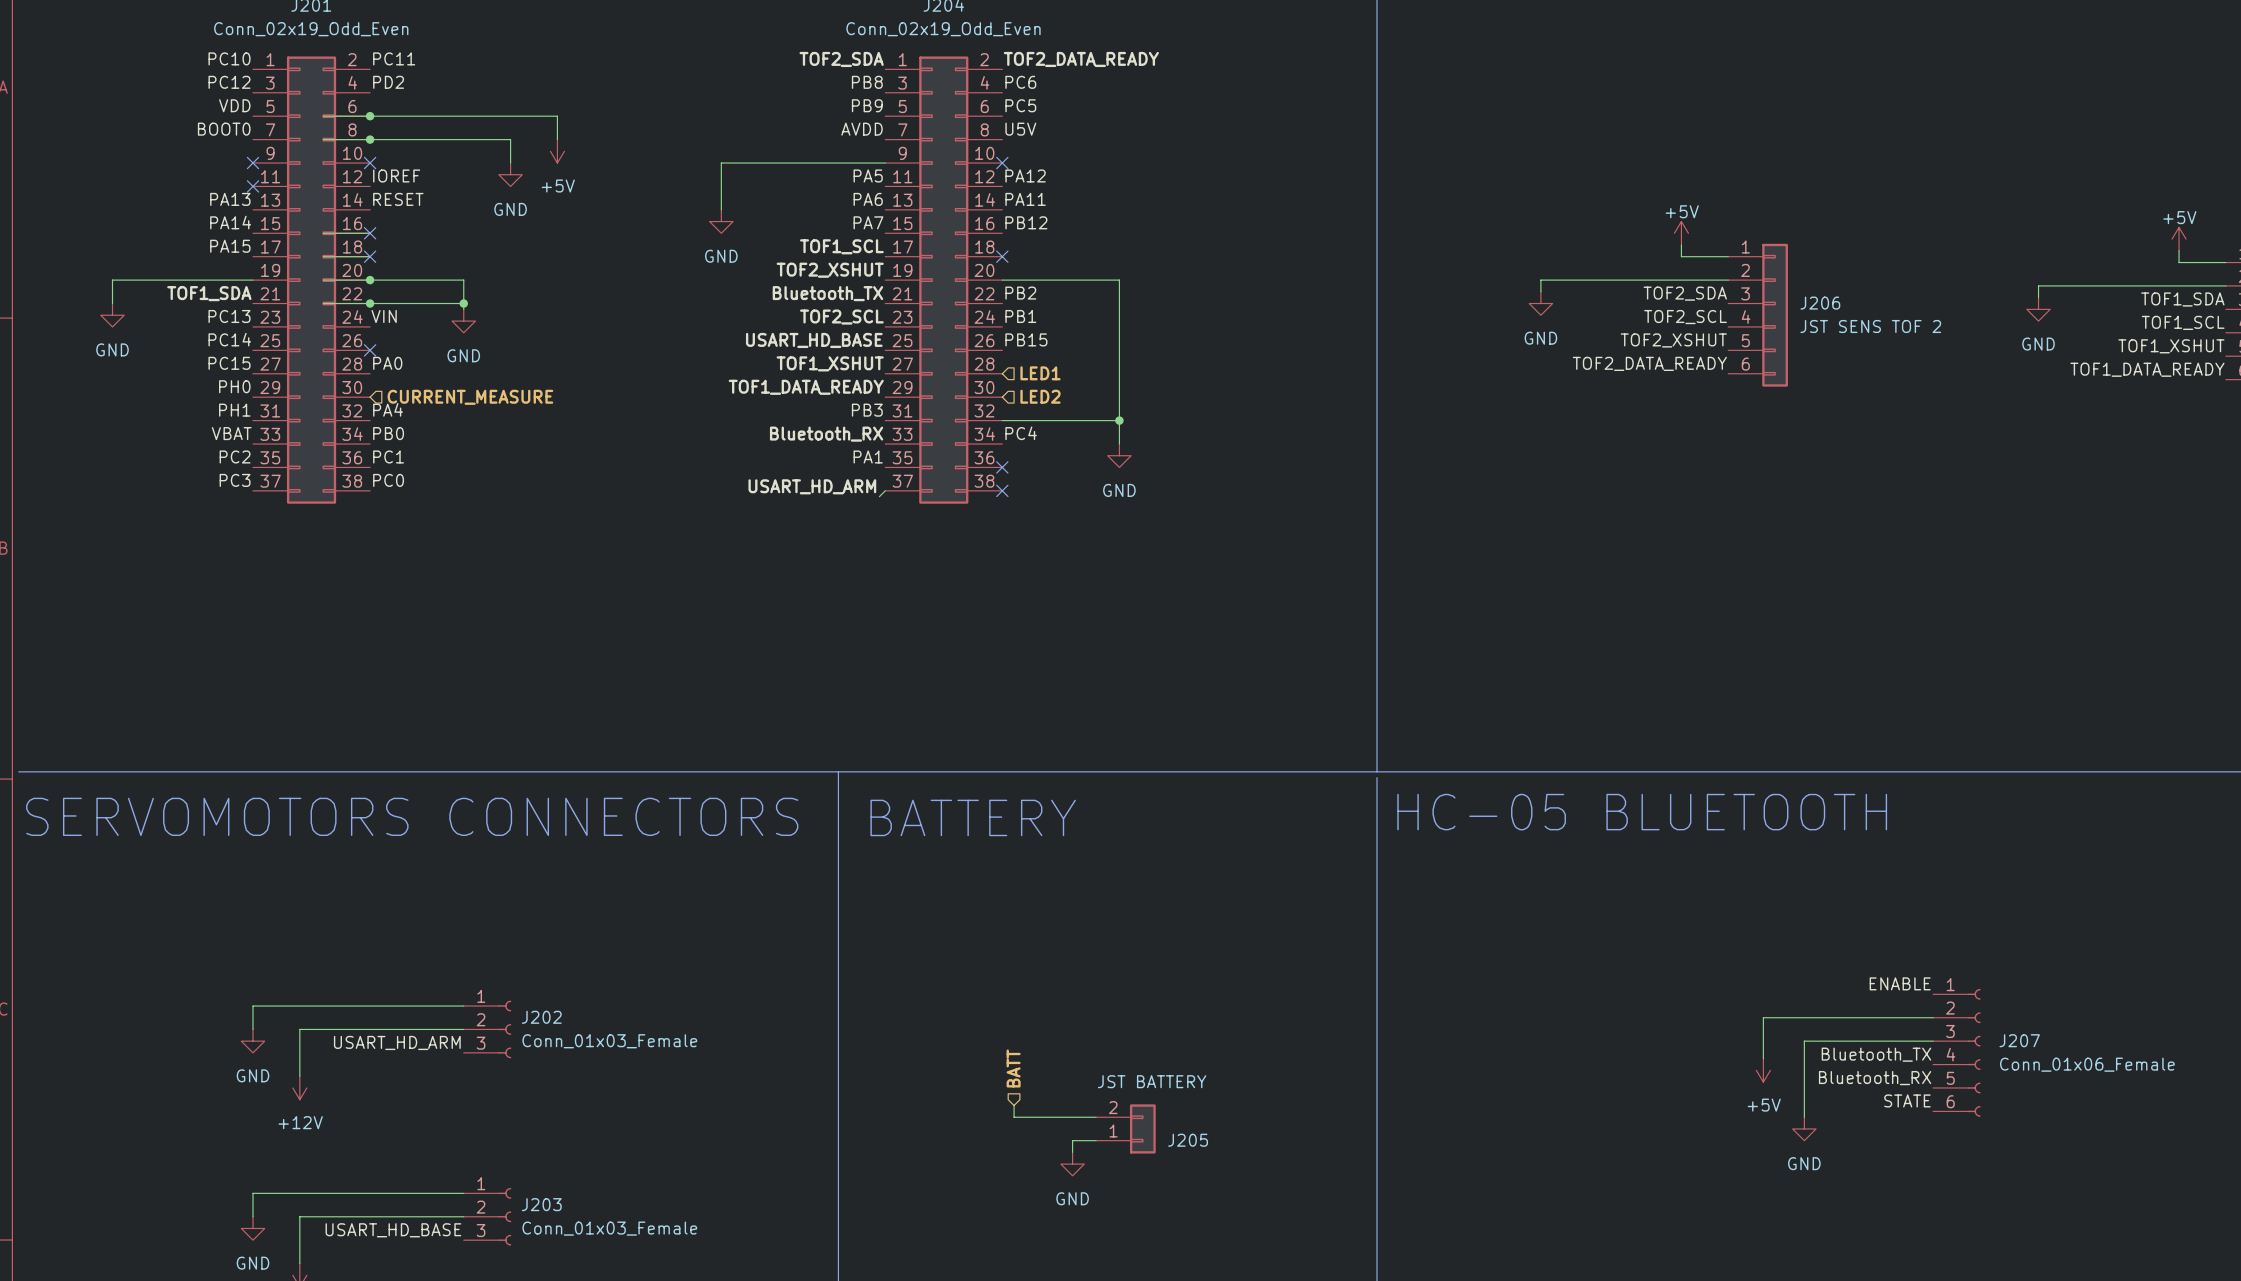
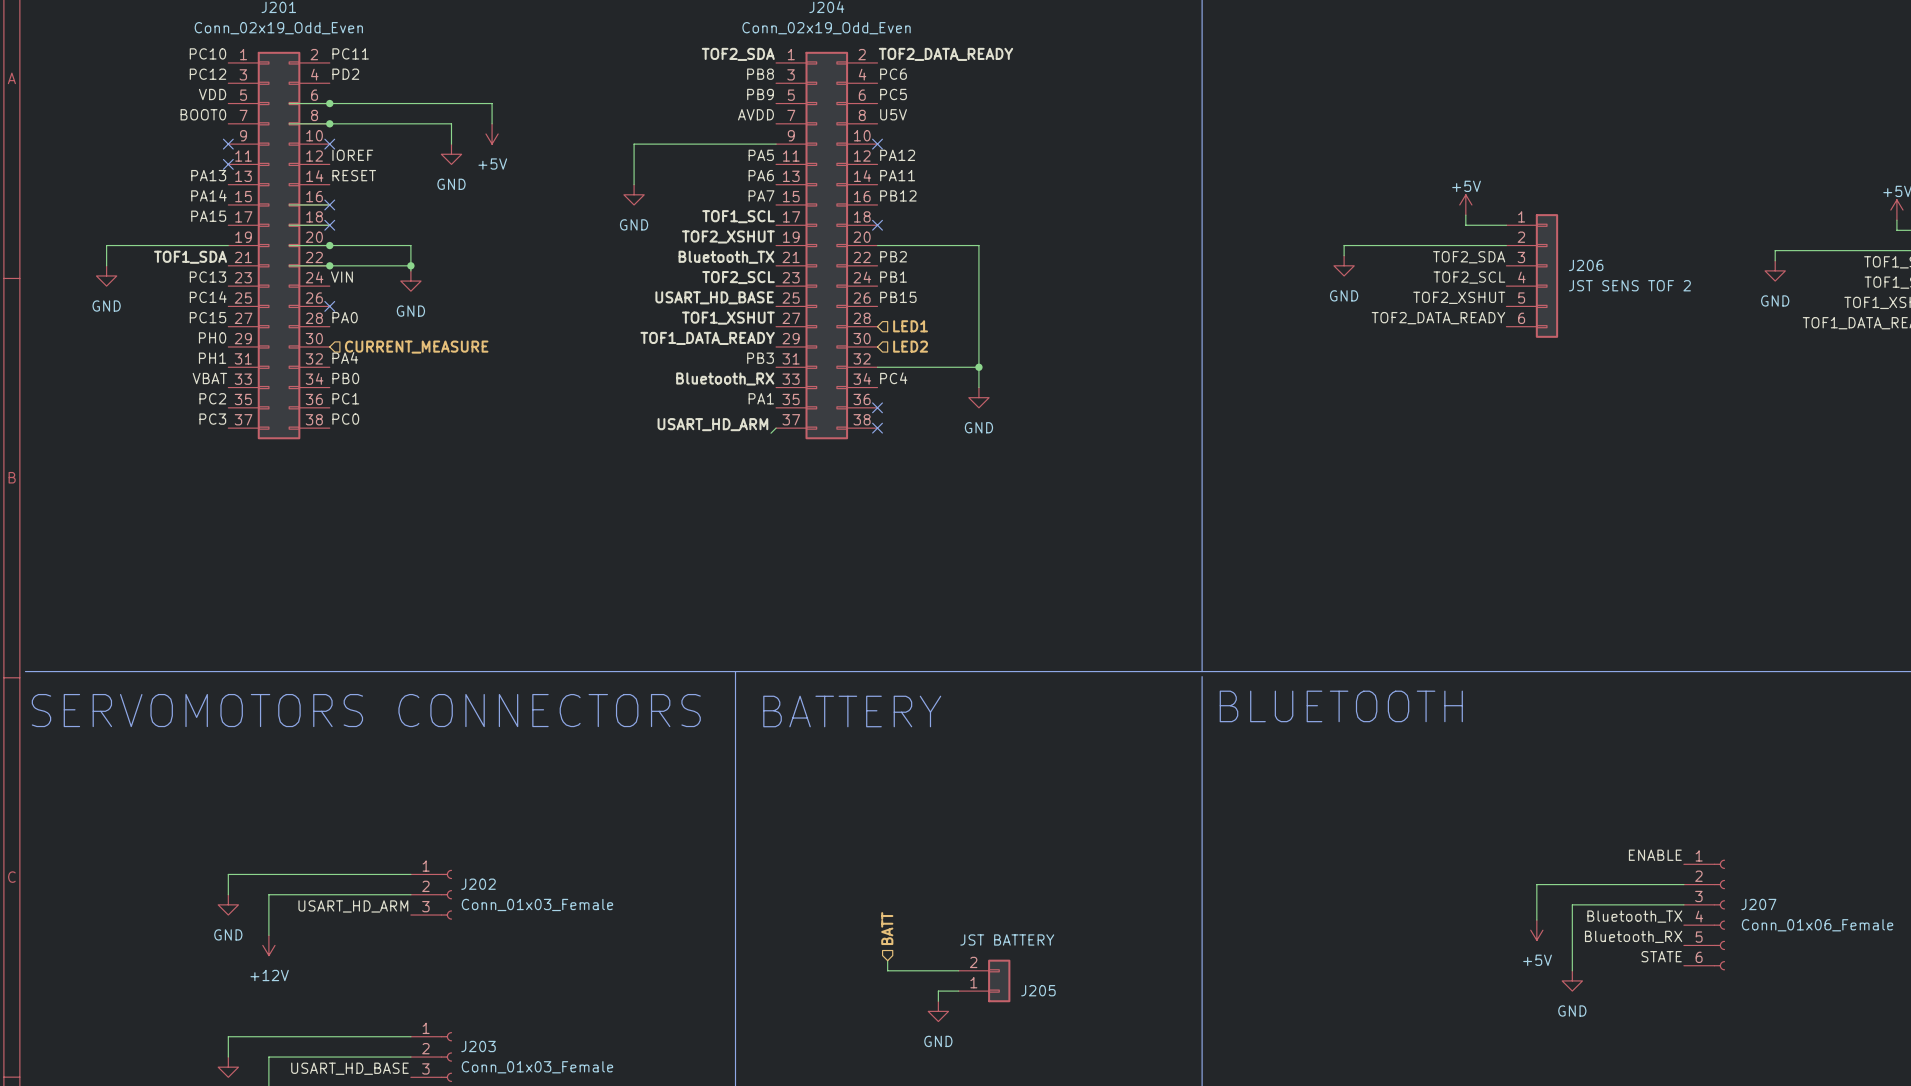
text: HC-05 BLUETOOTH (1642, 812) -> BLUETOOTH (1341, 706)

